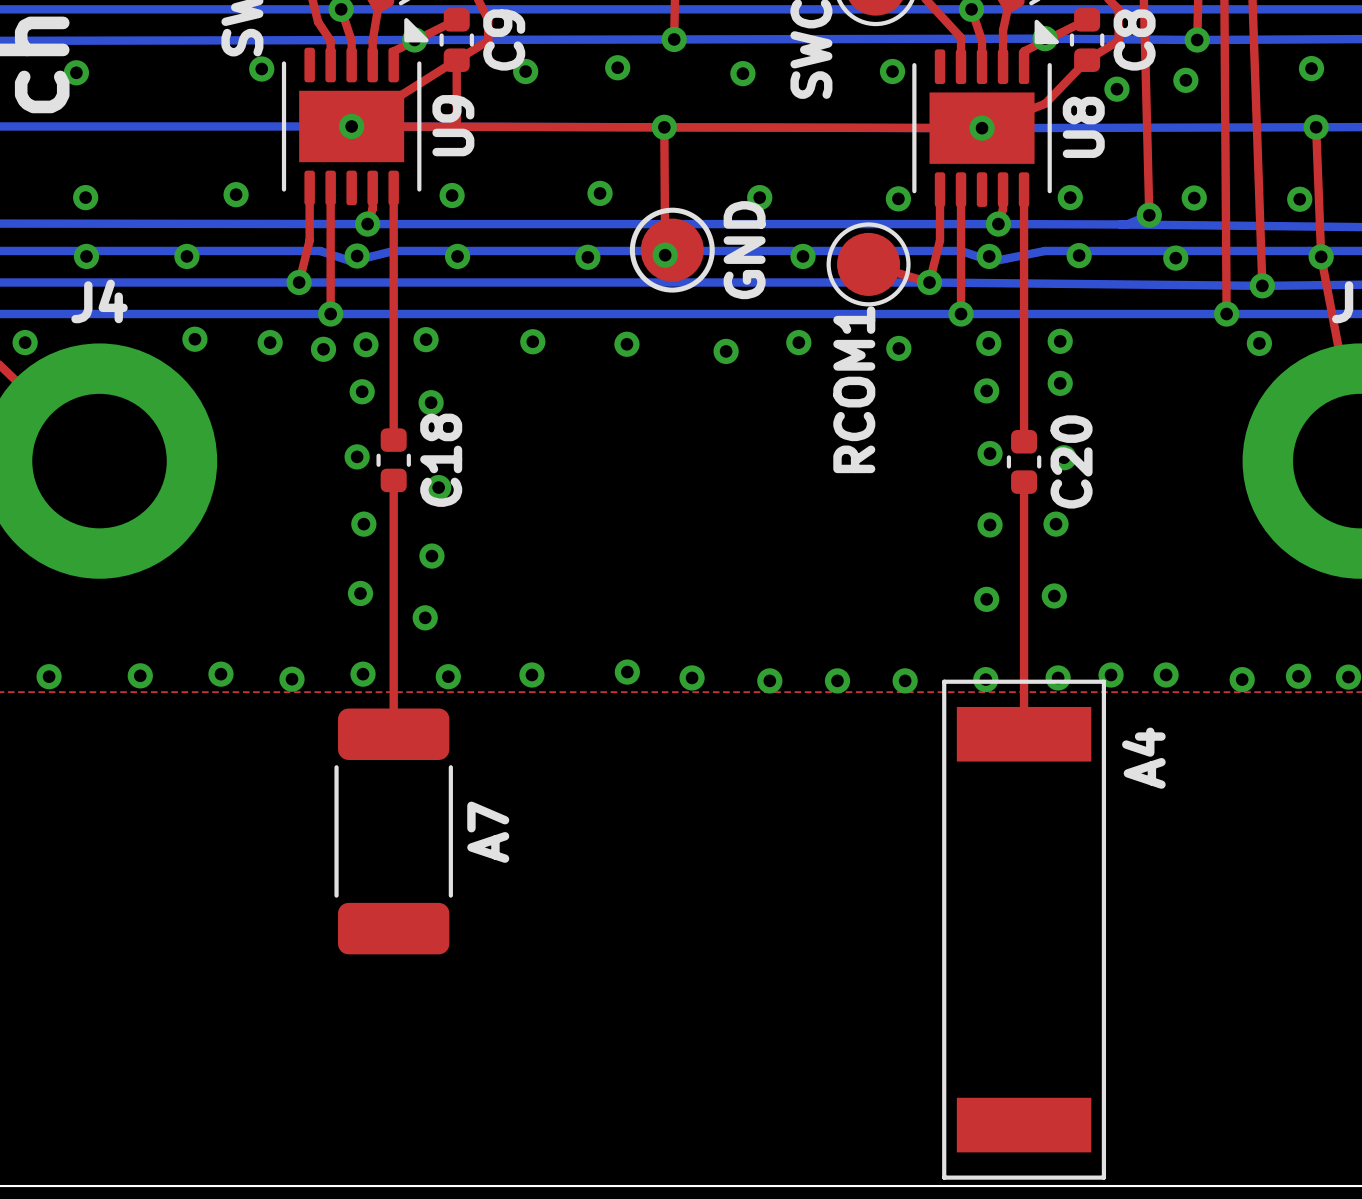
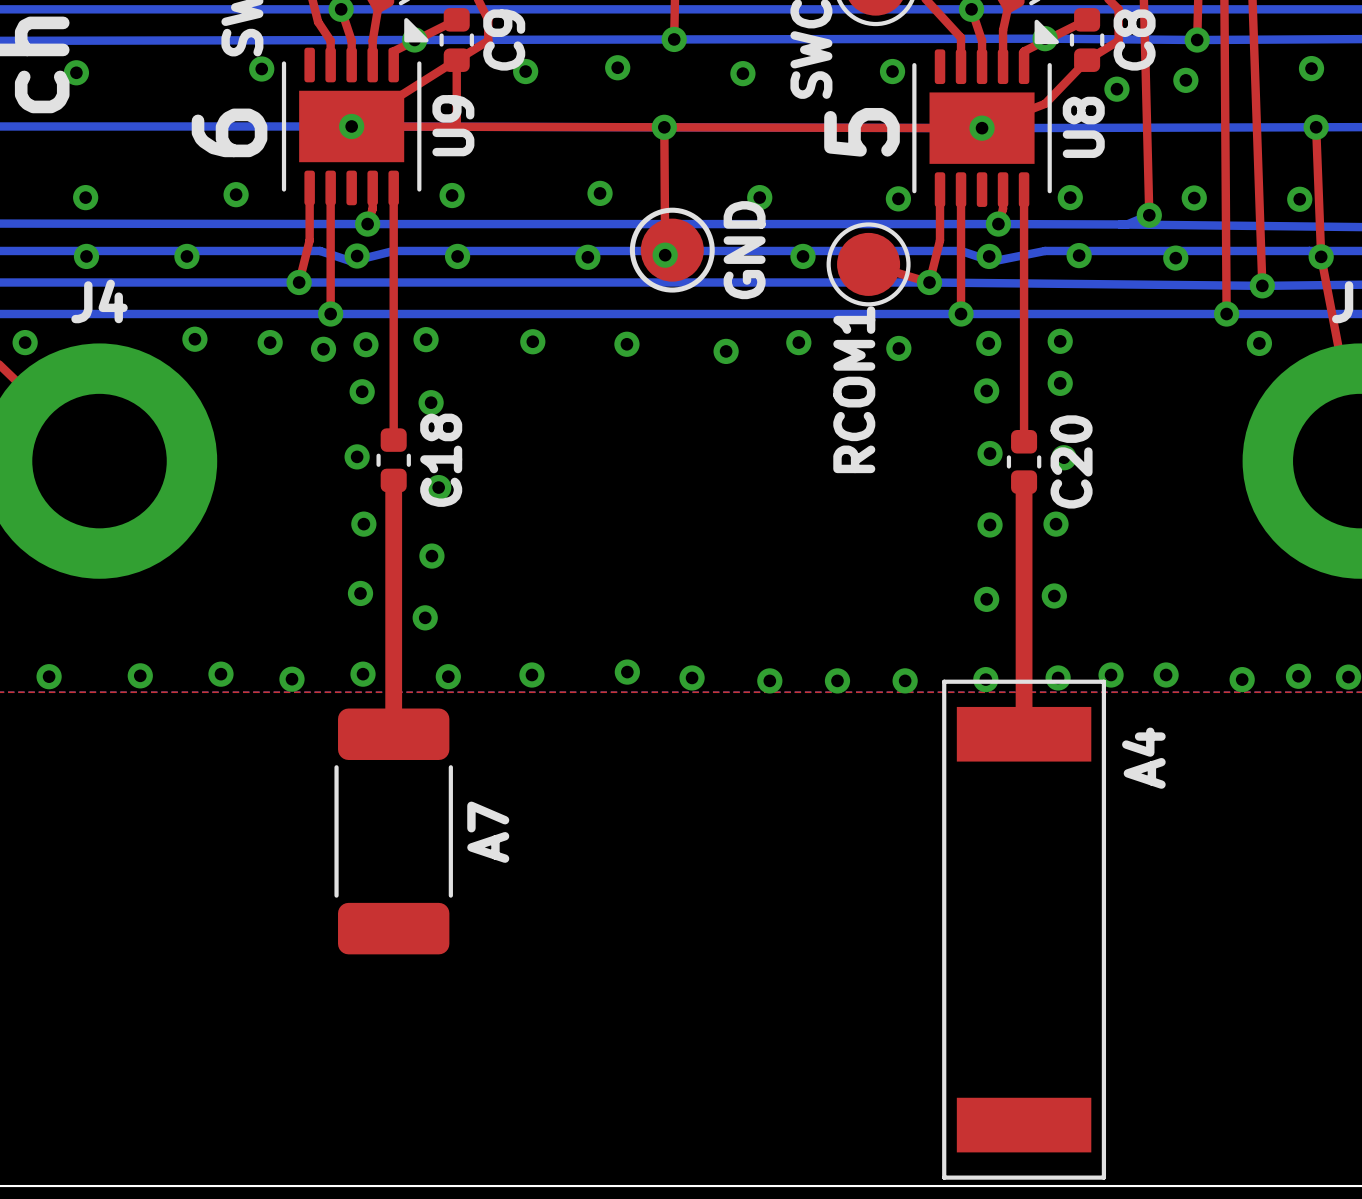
text: none -> 6 (229, 132)
text: none -> 5 (862, 132)
top track width: thin (393, 480) (393, 734) -> thick (393, 480) (393, 734)
top track width: thin (1024, 482) (1024, 734) -> thick (1024, 482) (1024, 734)

